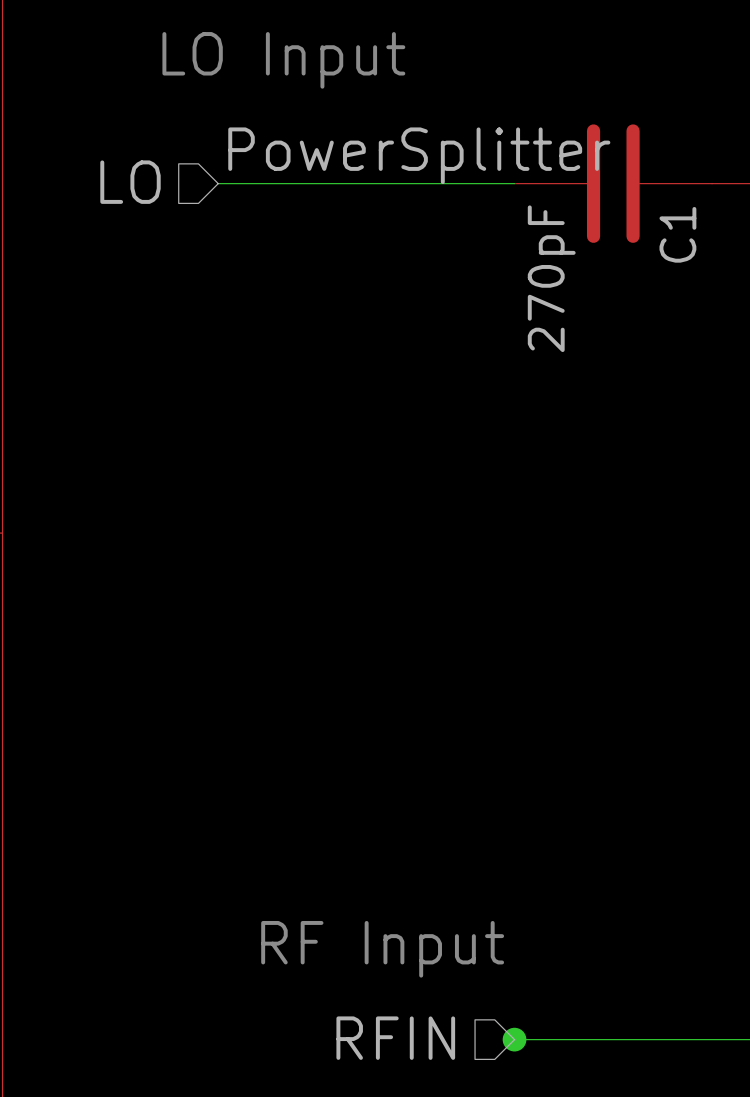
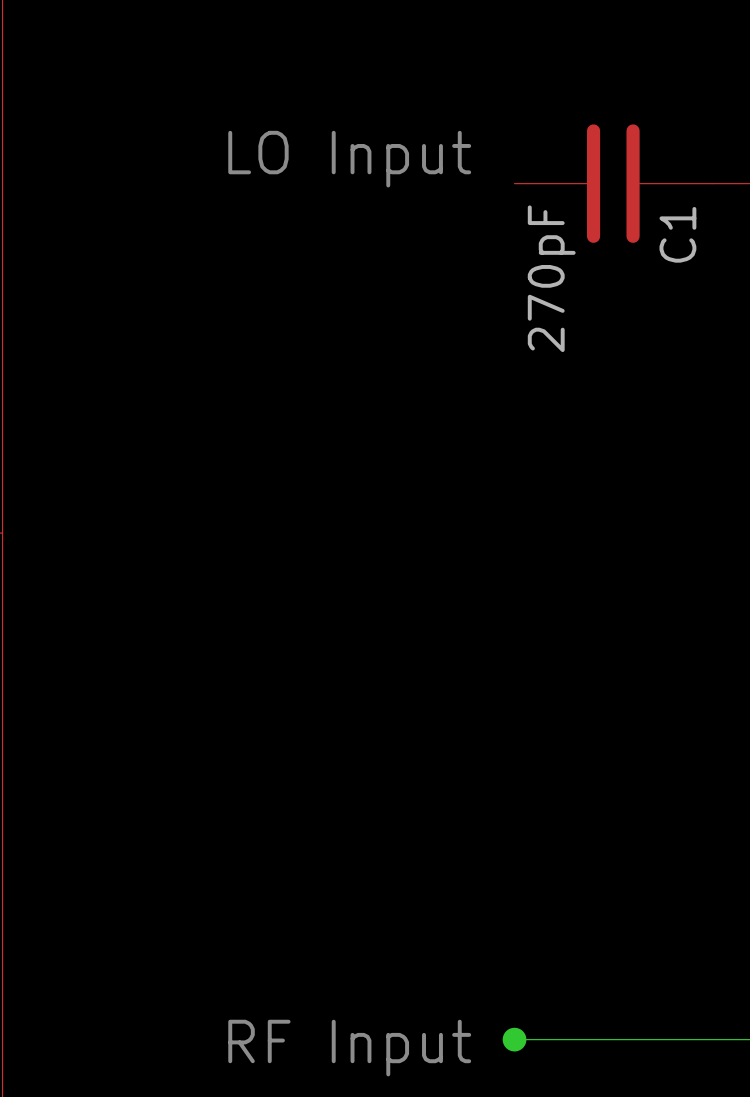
text position: LO Input (283, 60) -> LO Input (349, 159)
label: PowerSplitter (419, 155) -> none
hierarchical label: LO (130, 182) -> none
wire: (218, 183) (514, 183) -> none
text position: RF Input (382, 949) -> RF Input (349, 1048)
hierarchical label: RFIN (395, 1038) -> none

